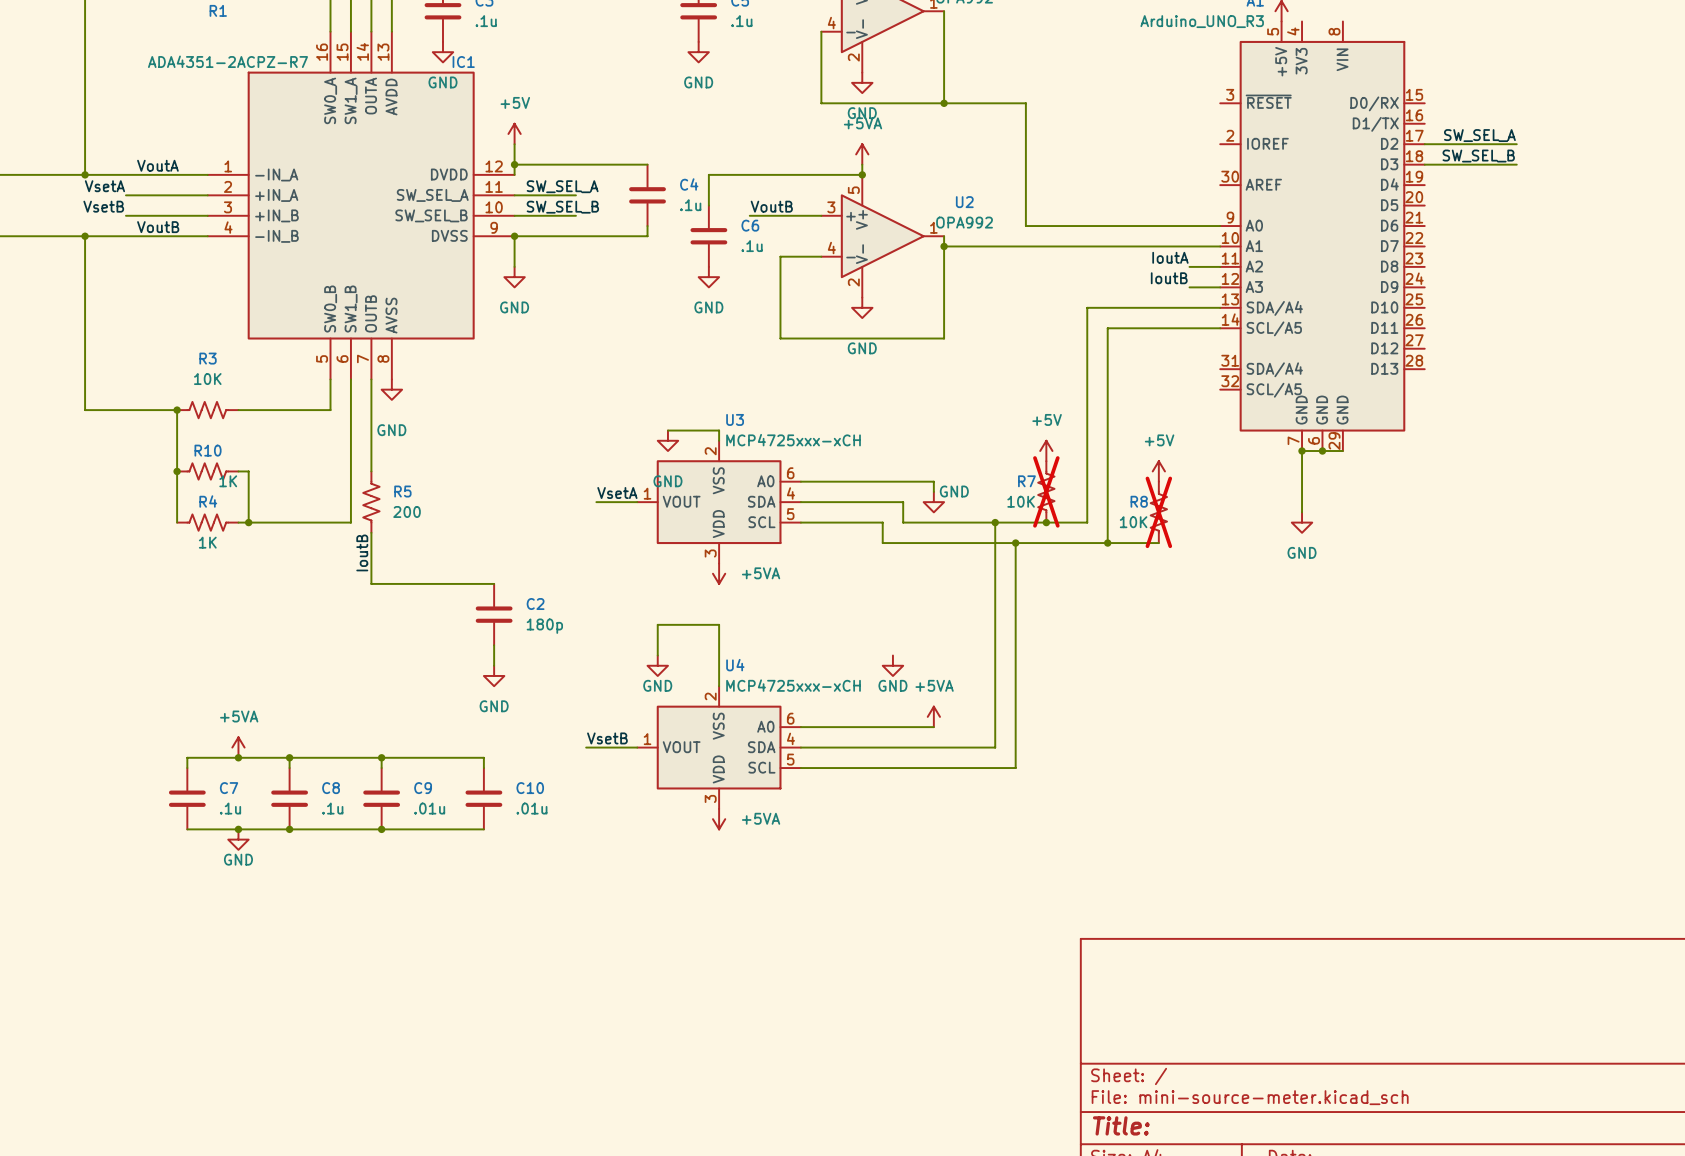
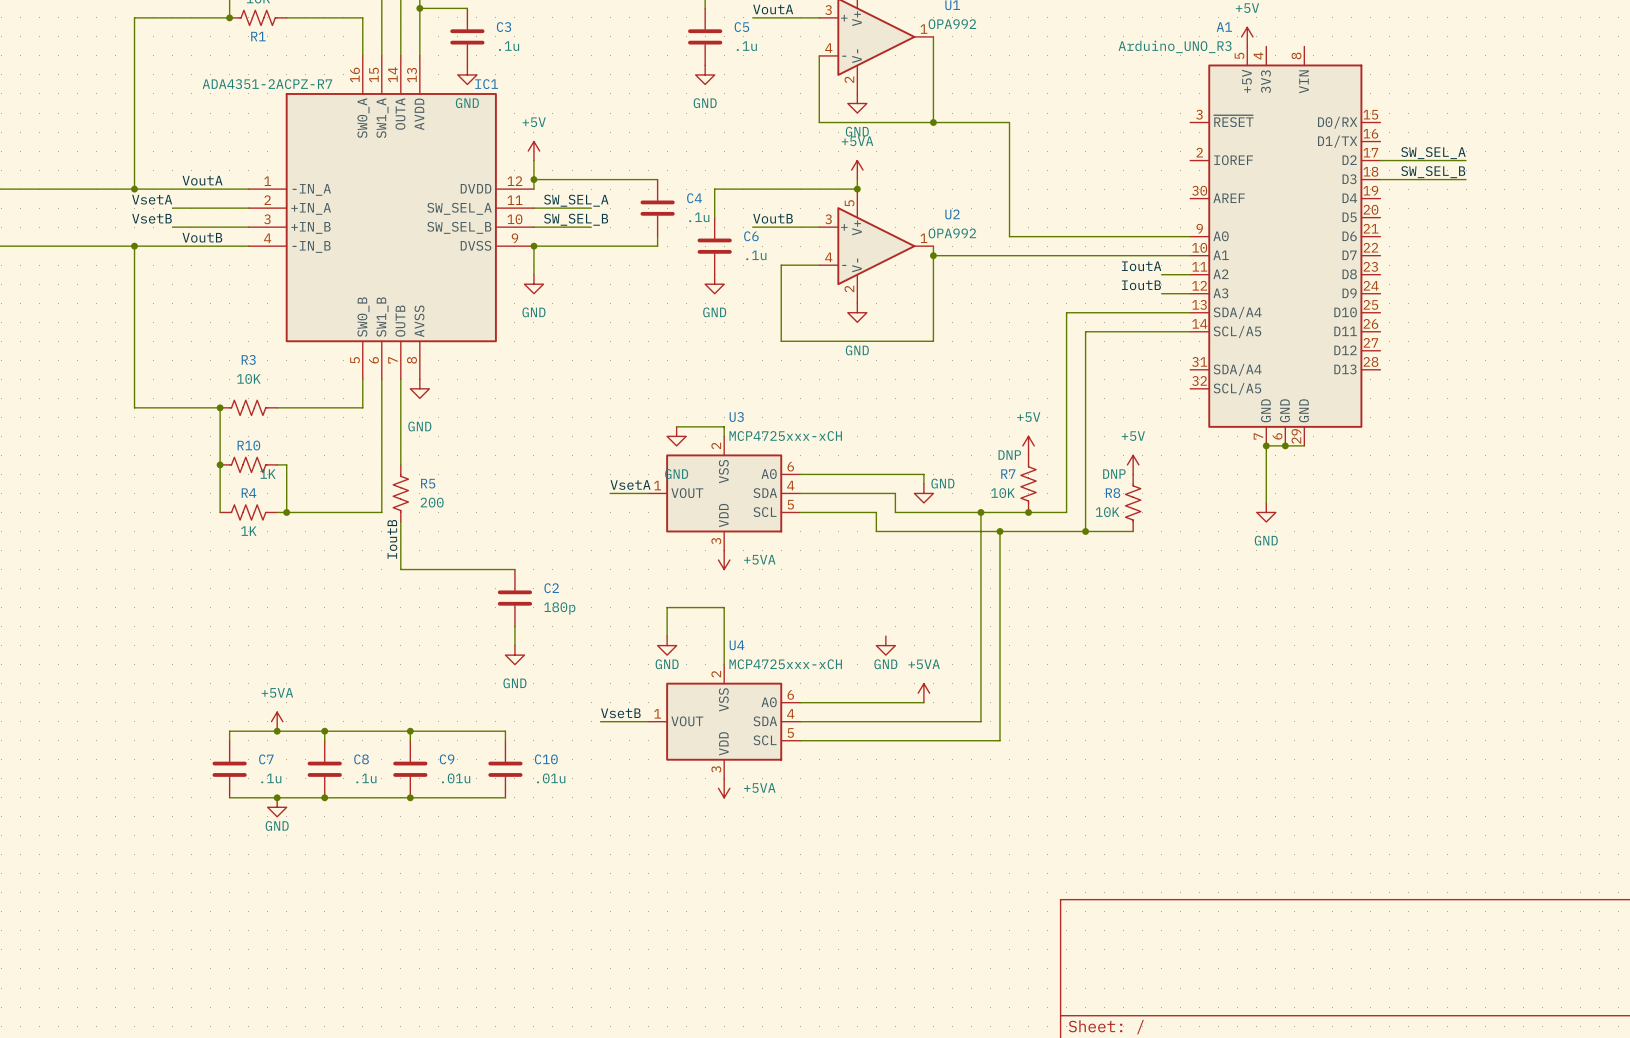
R7 text: none -> DNP (1009, 455)
R8 text: none -> DNP (1114, 474)
R7 do-not-place cross: (1046, 491) -> none
R8 do-not-place cross: (1158, 512) -> none

